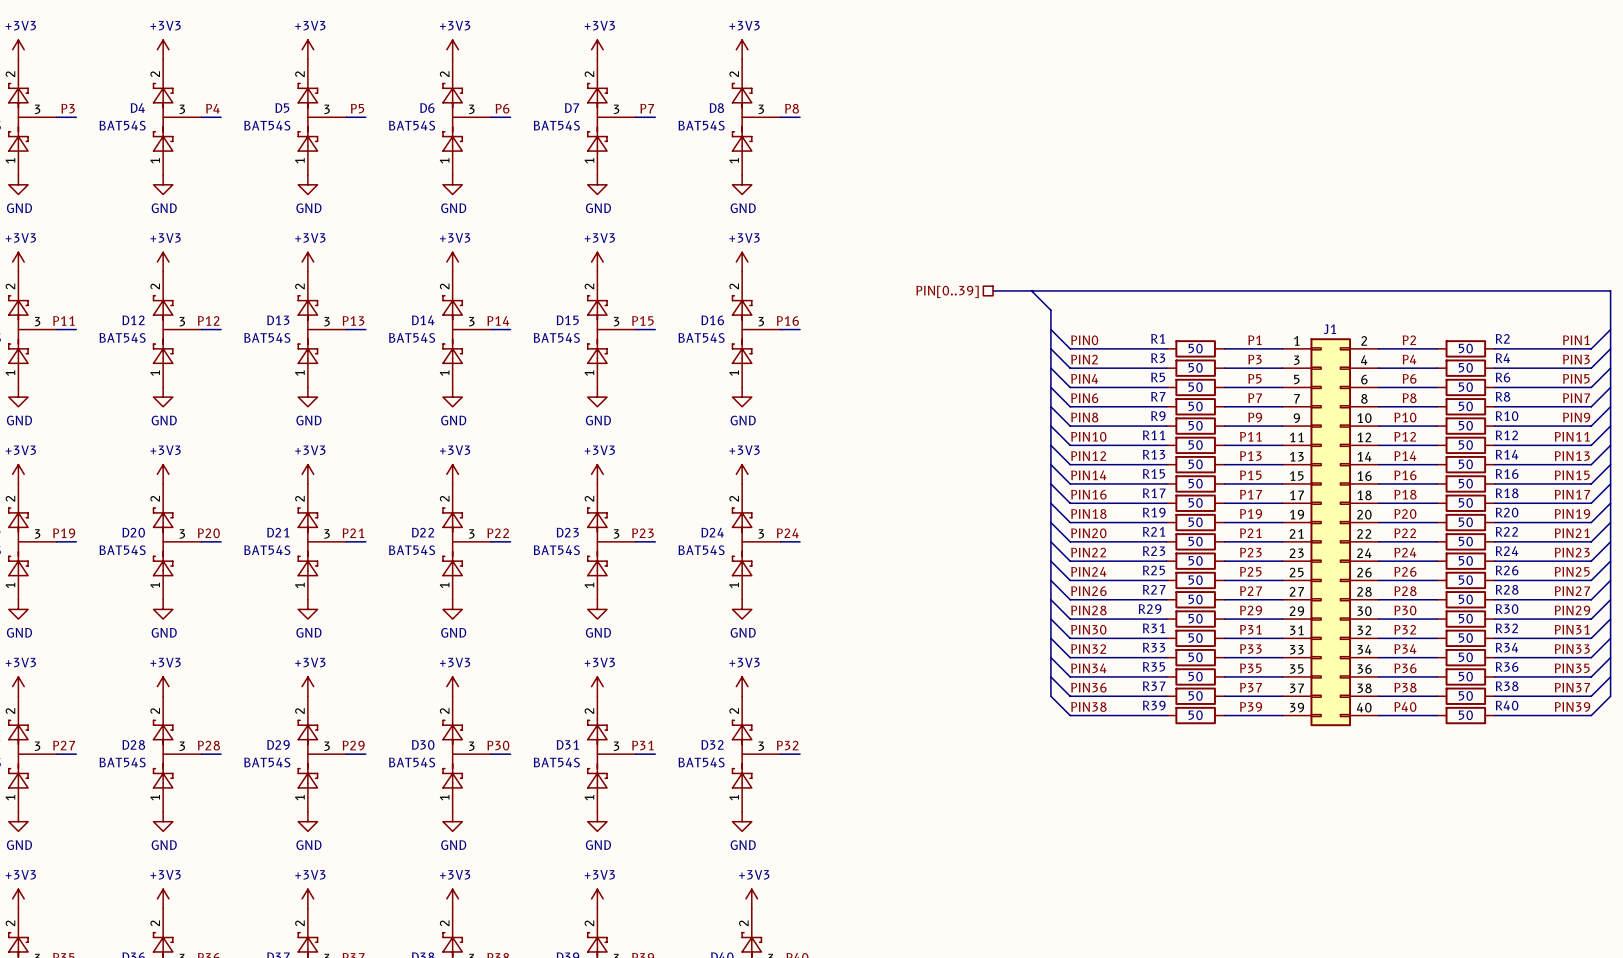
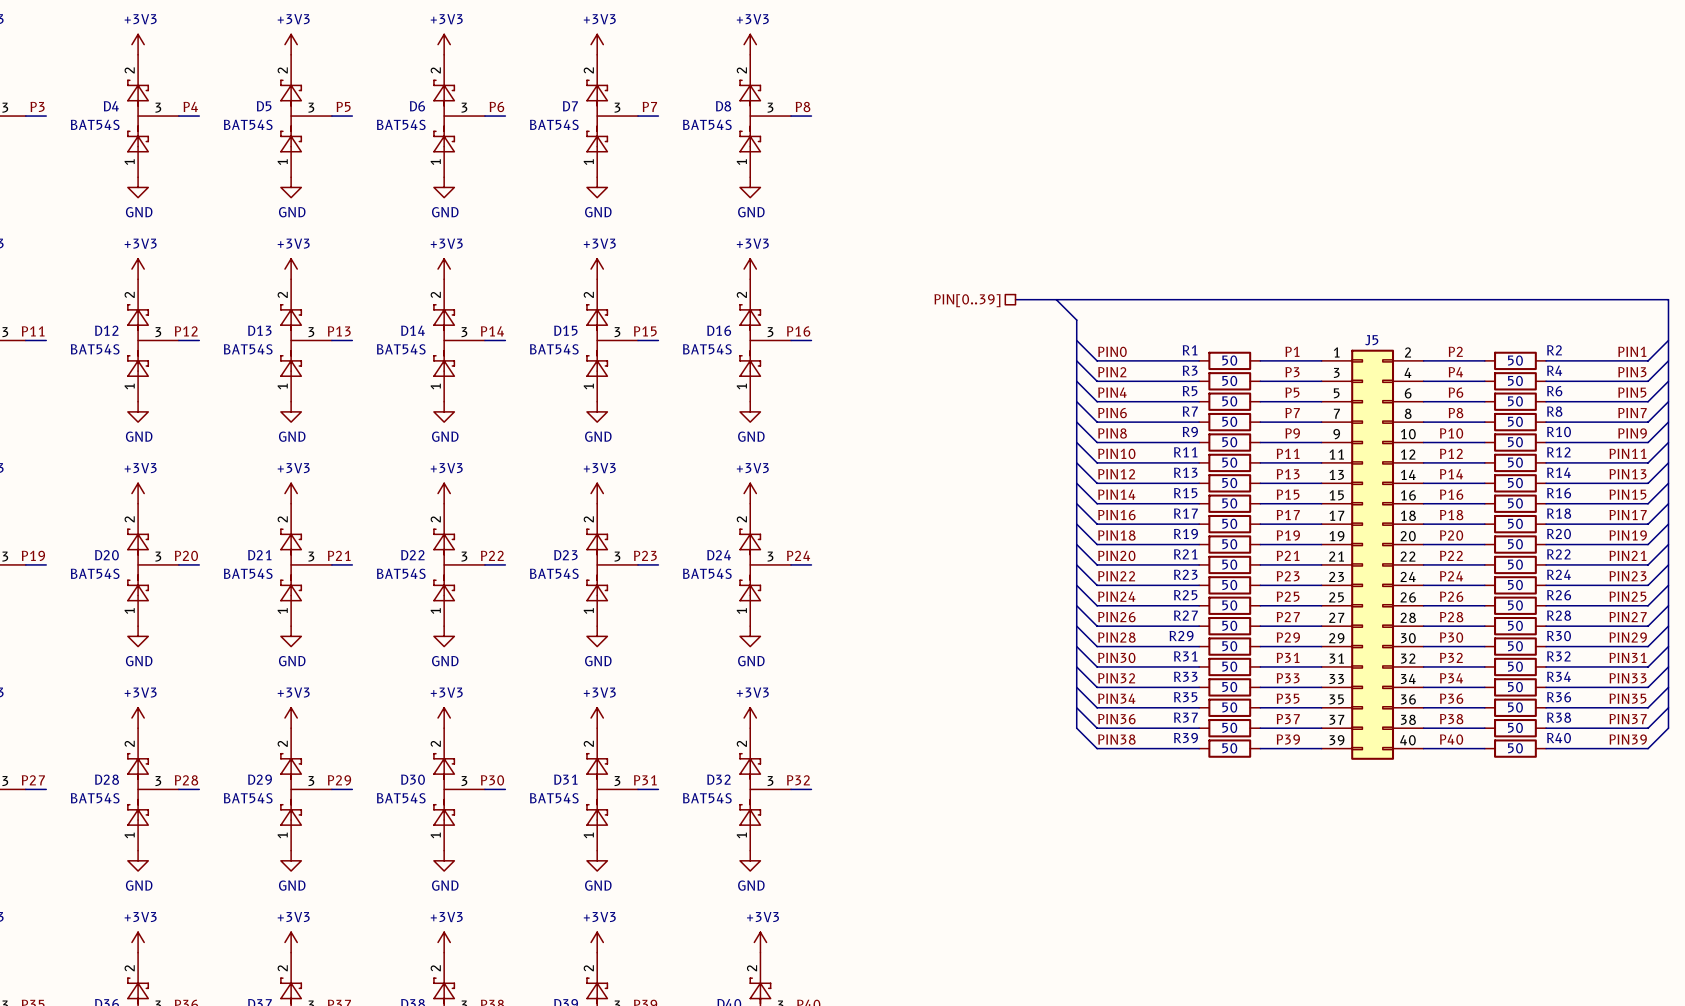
J1 name: J1 (1329, 329) -> J5 (1371, 340)

